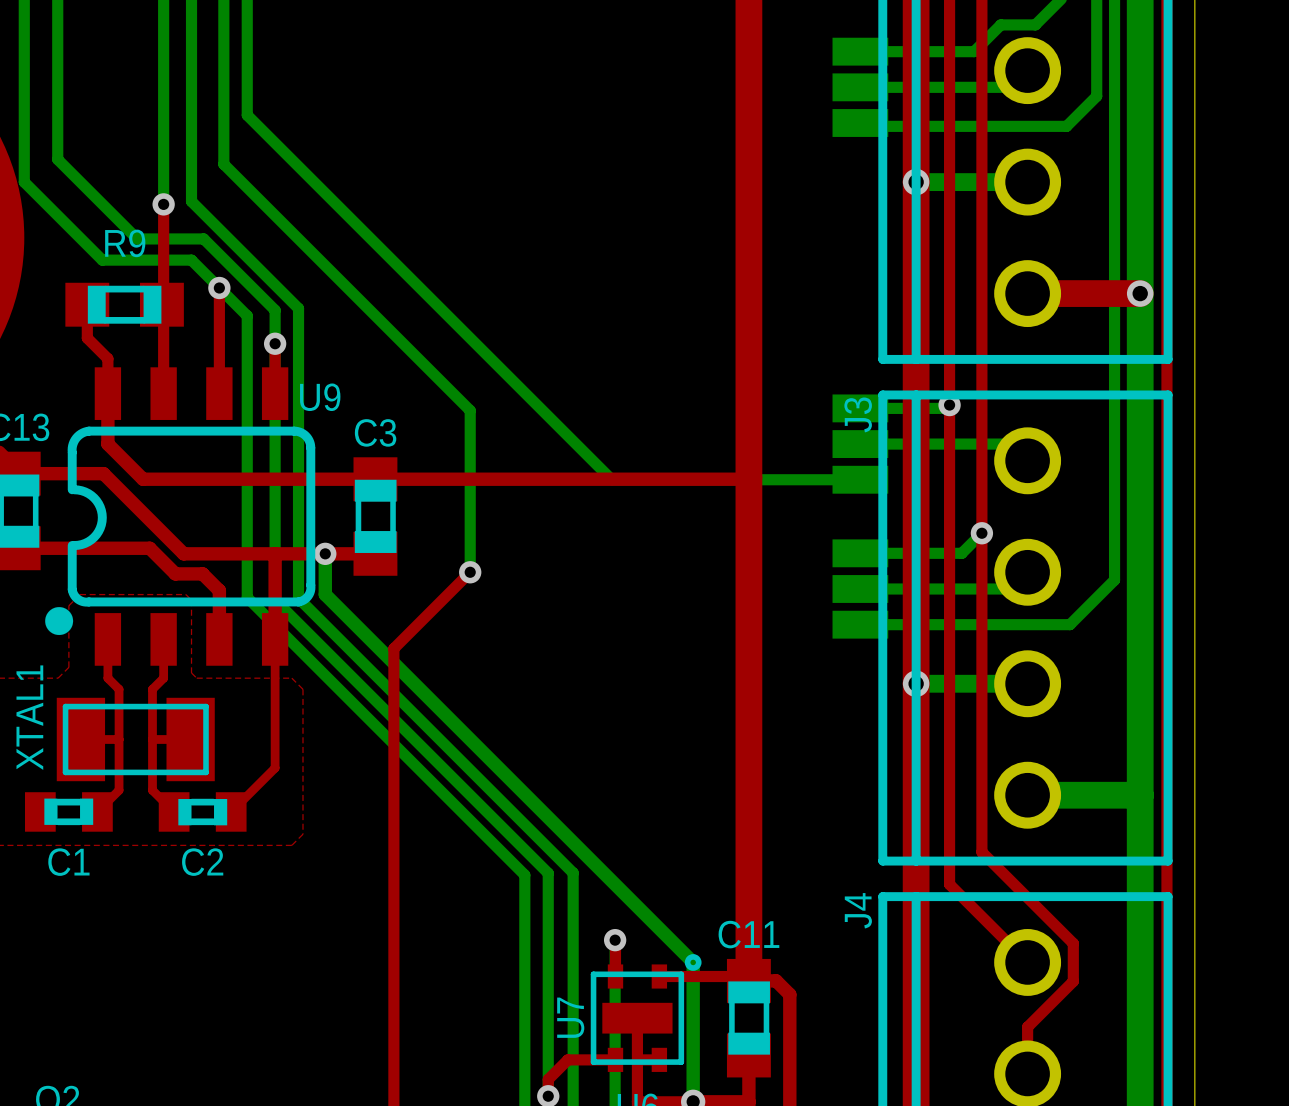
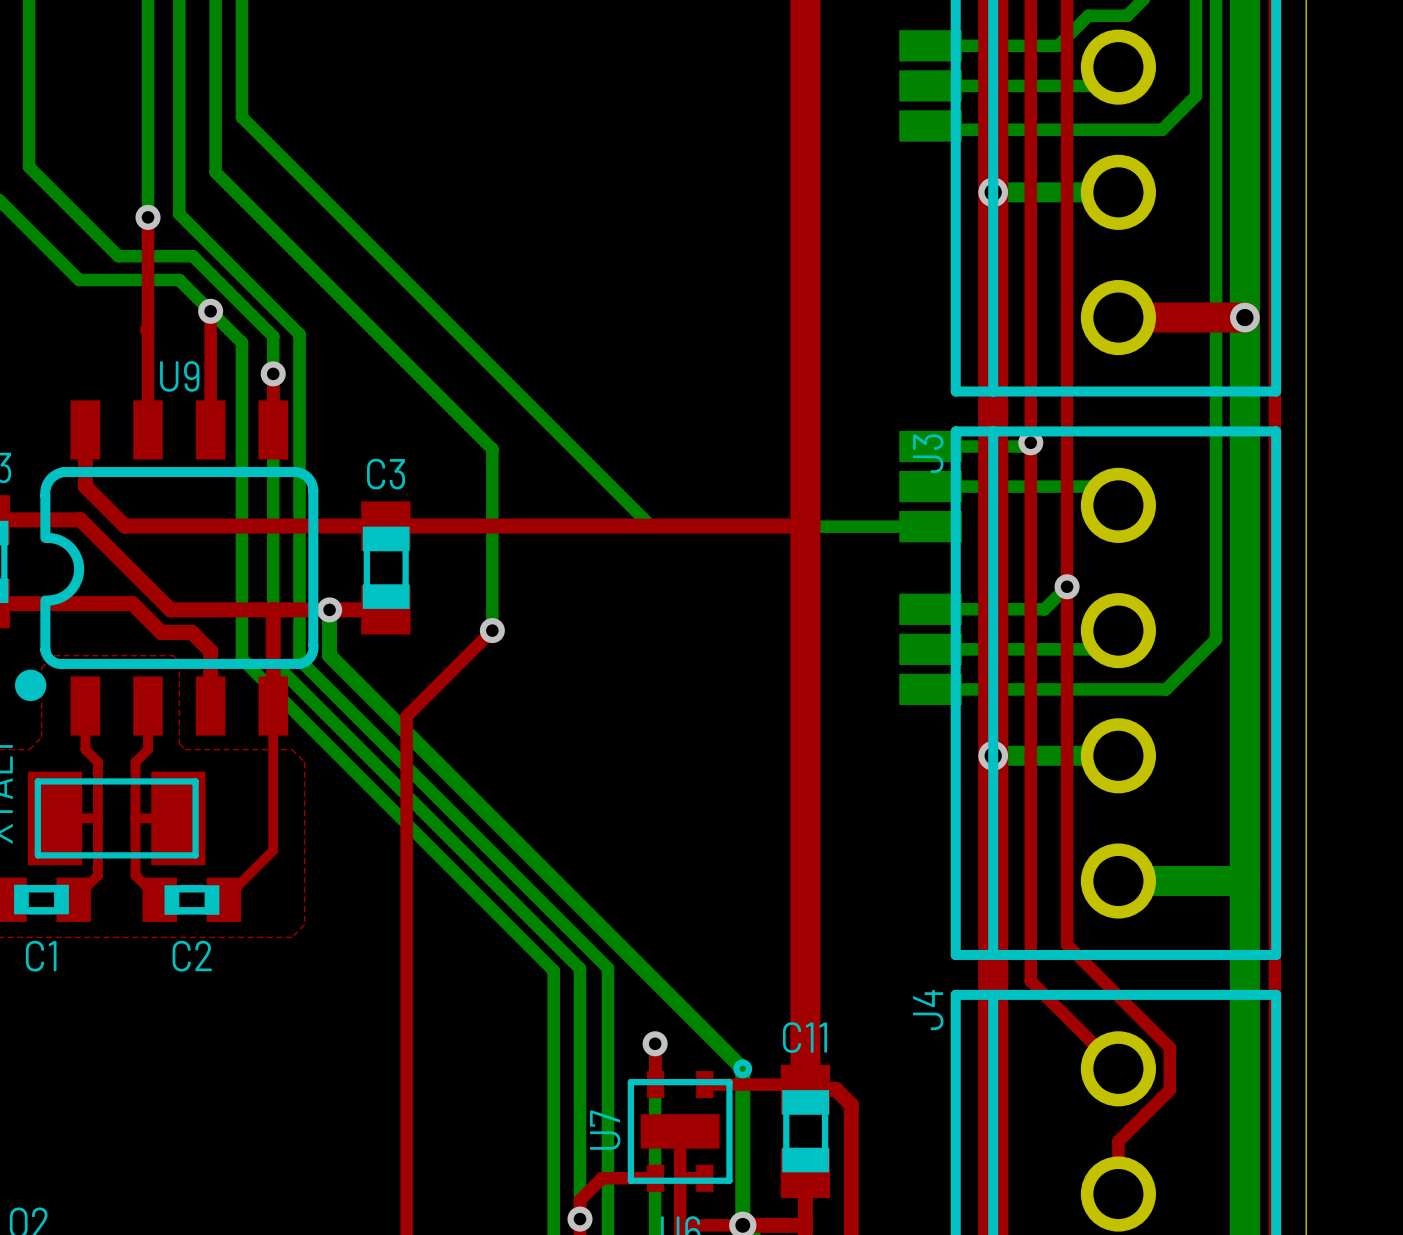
top track: (87, 304) (87, 338) (107, 358) (107, 399) -> none
R9: (124, 304) -> none
U9 name position: U9 (320, 397) -> U9 (179, 376)

